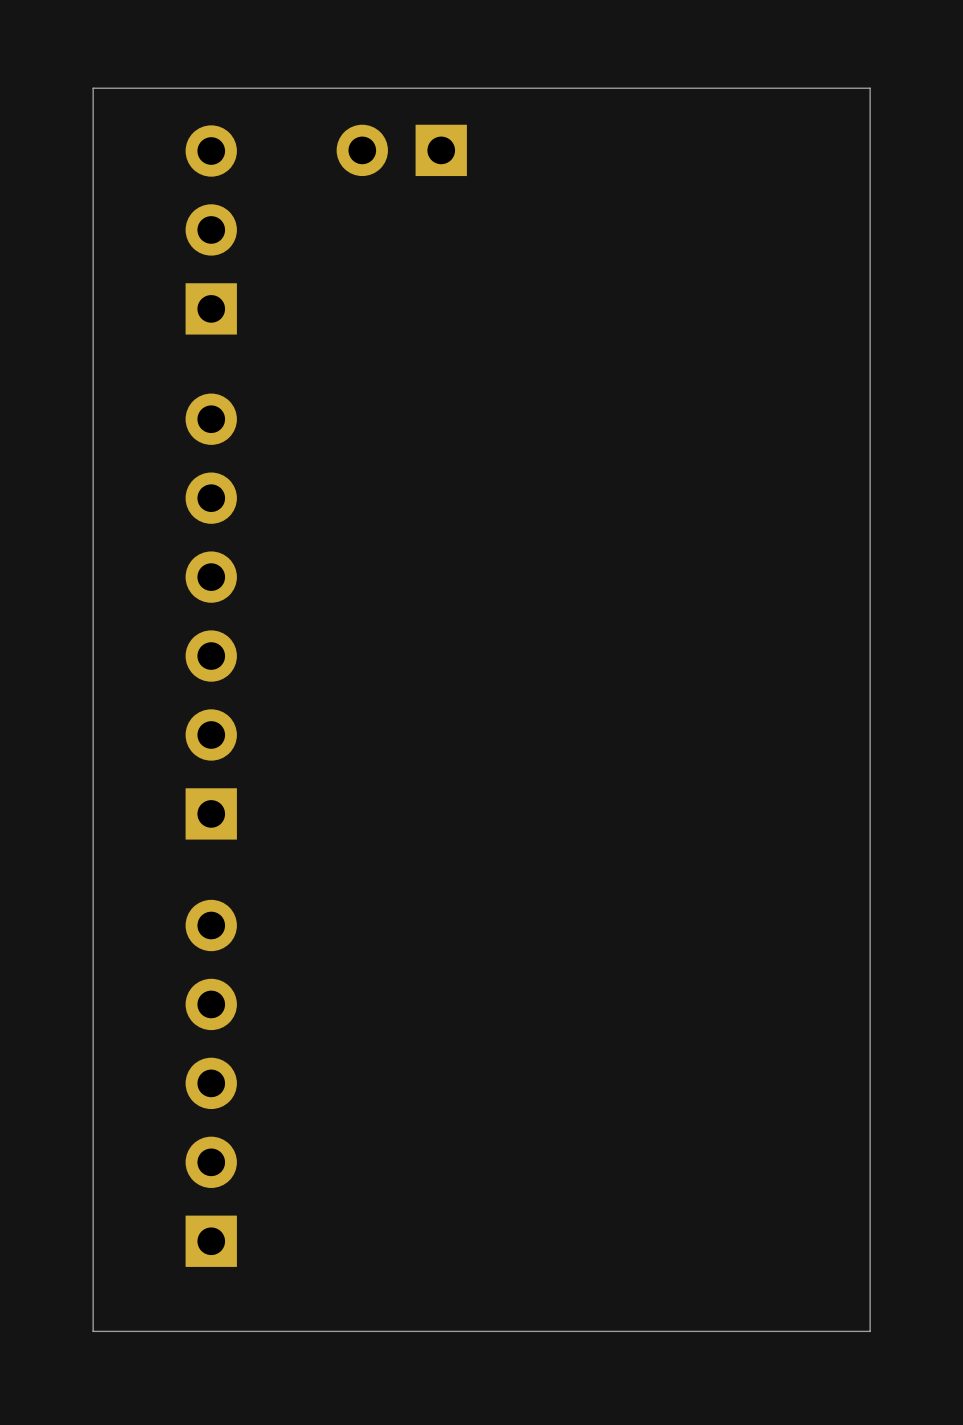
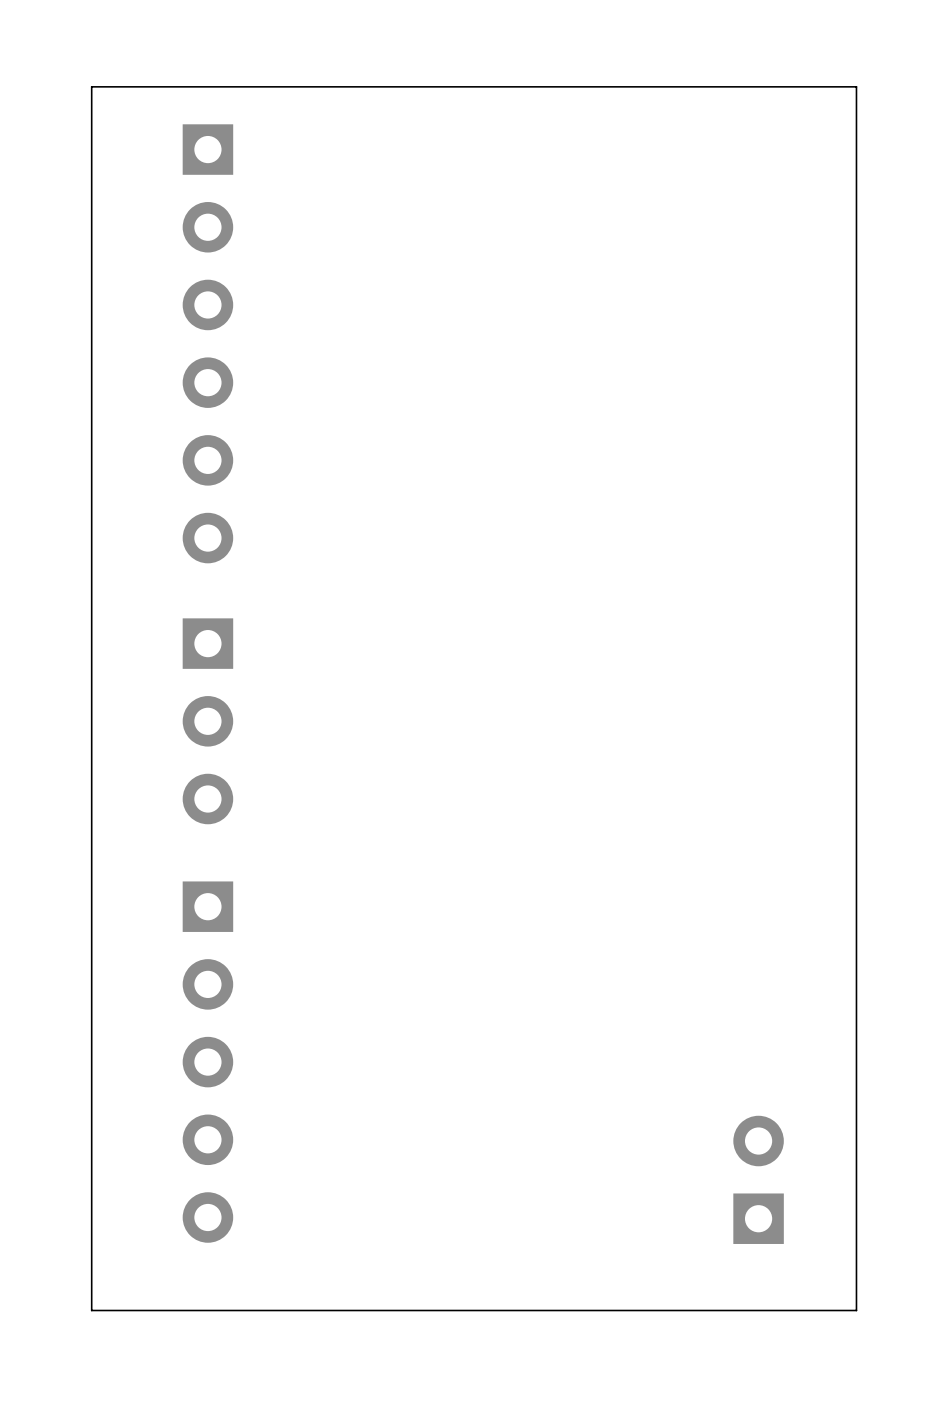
part: (401, 150) -> none
part rotation: 0° (211, 229) -> 180° (207, 721)
part position: (211, 229) -> (207, 721)
part rotation: 0° (211, 616) -> 180° (207, 343)
part rotation: 0° (211, 1083) -> 180° (207, 1062)
part: none -> (758, 1179)

